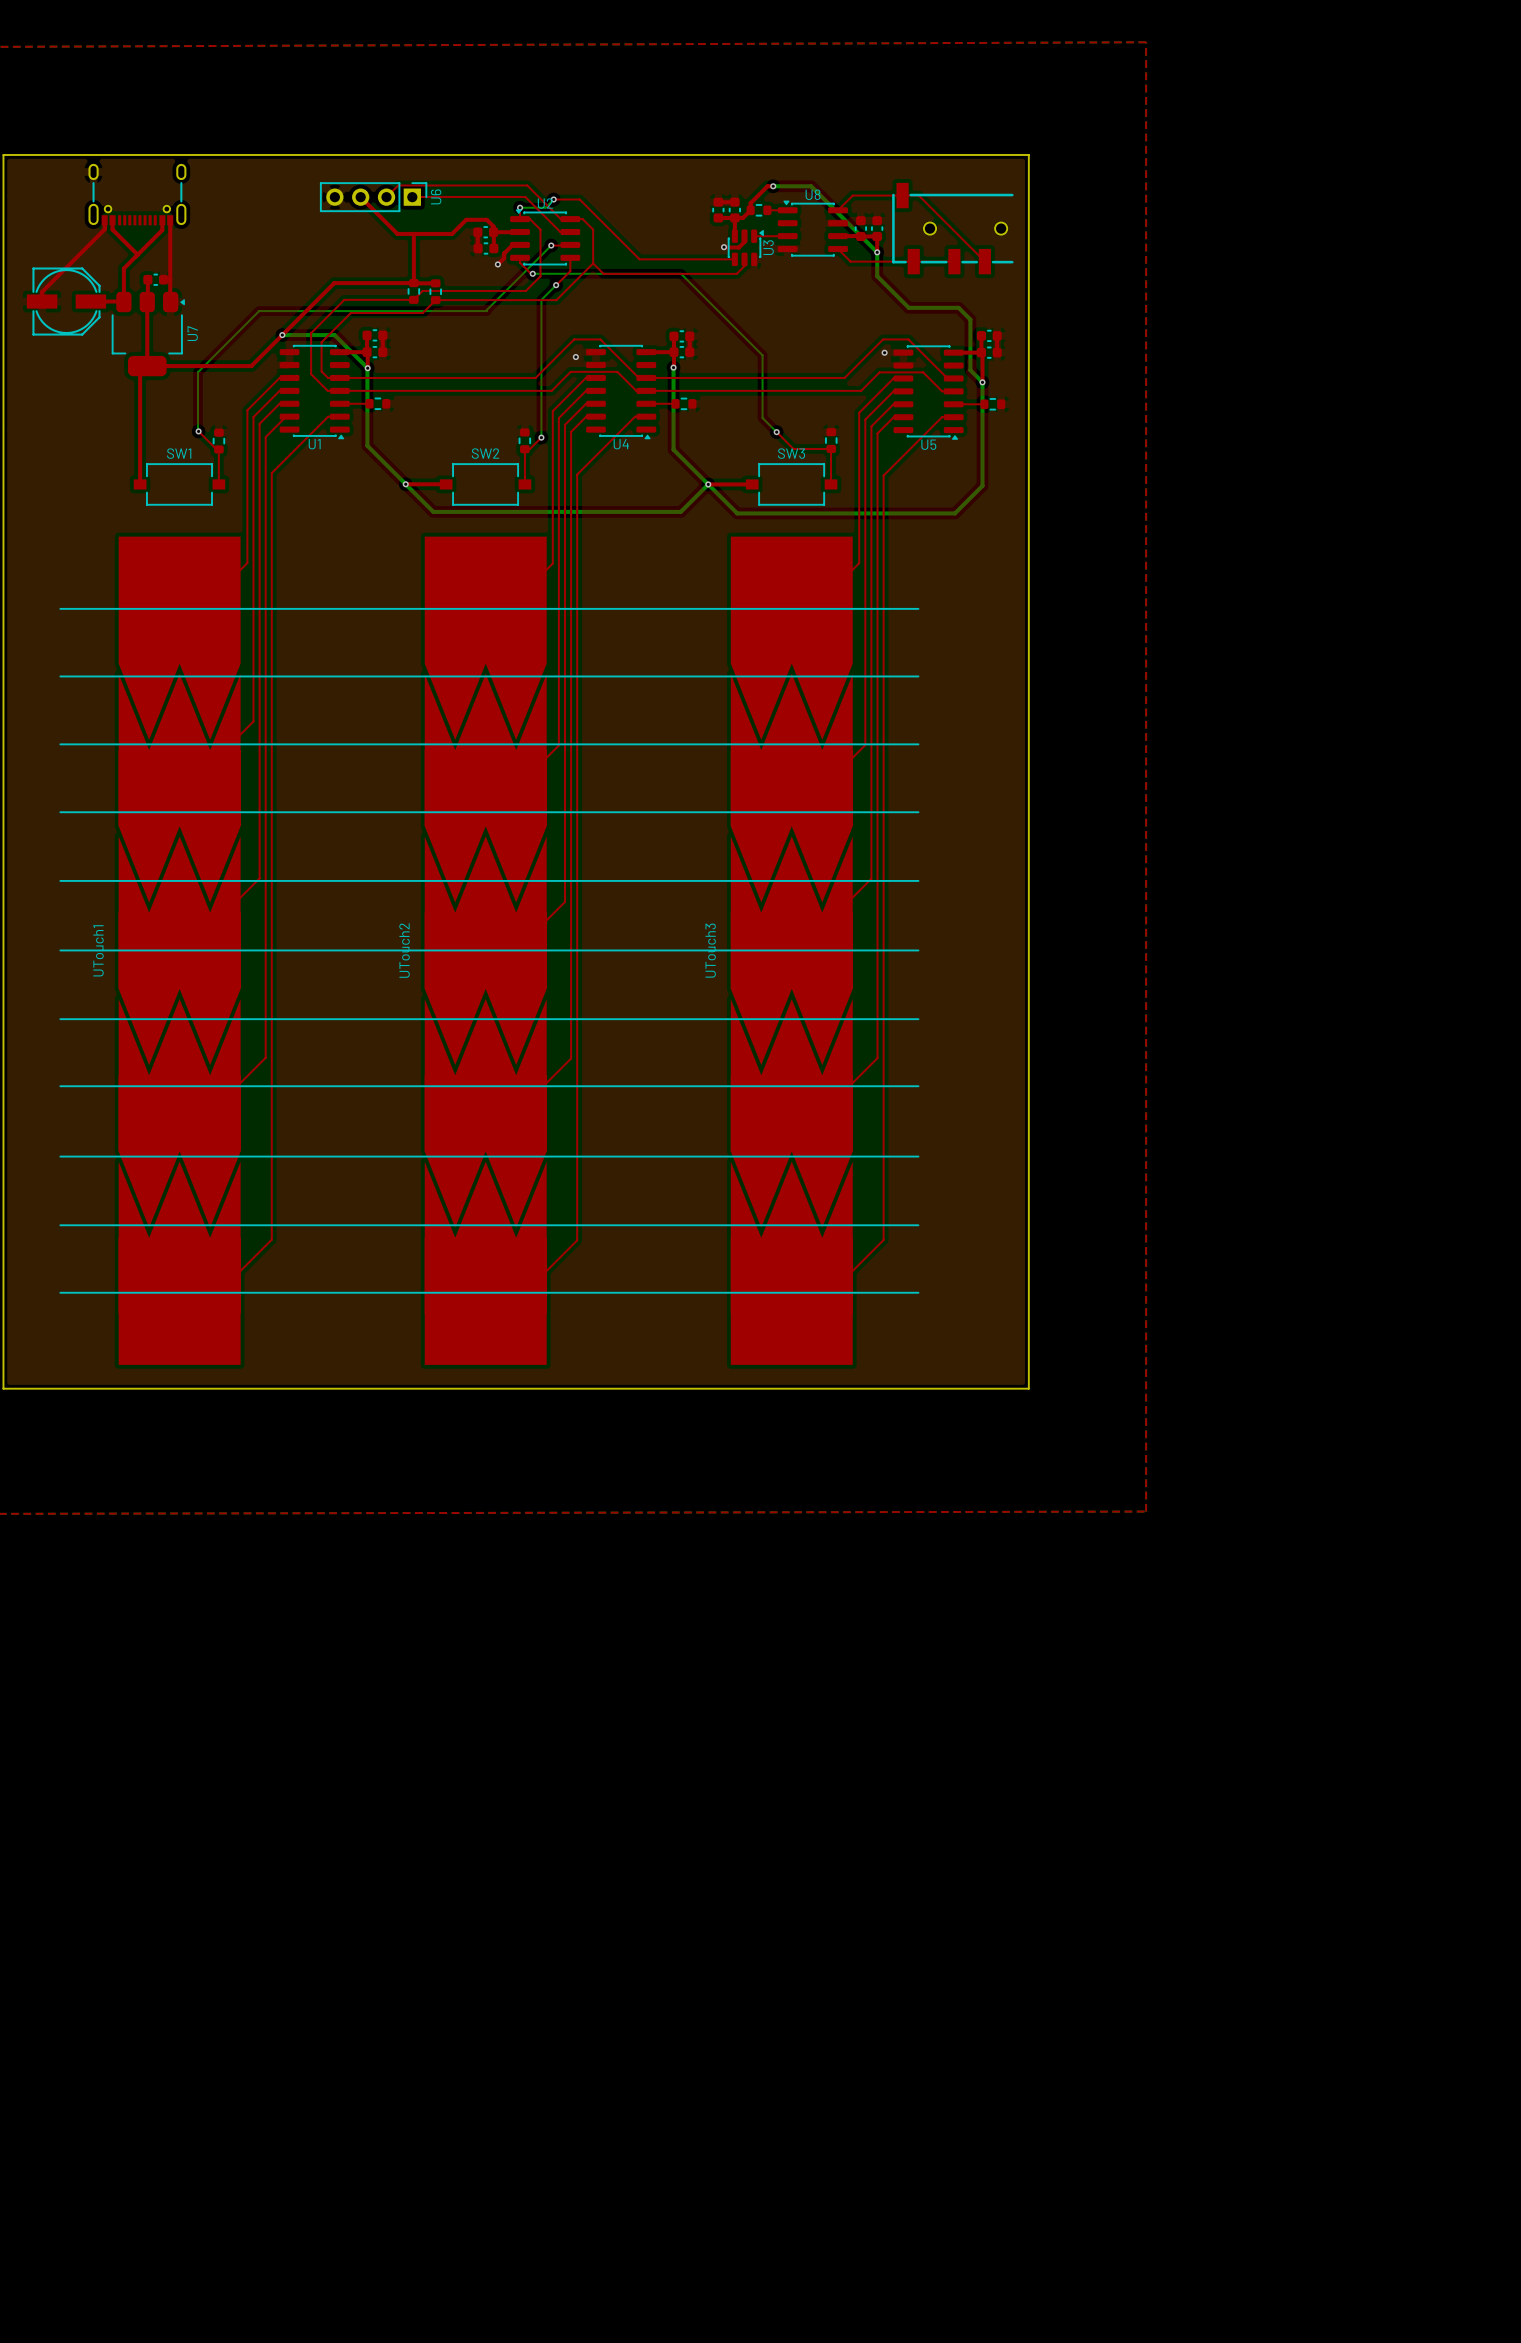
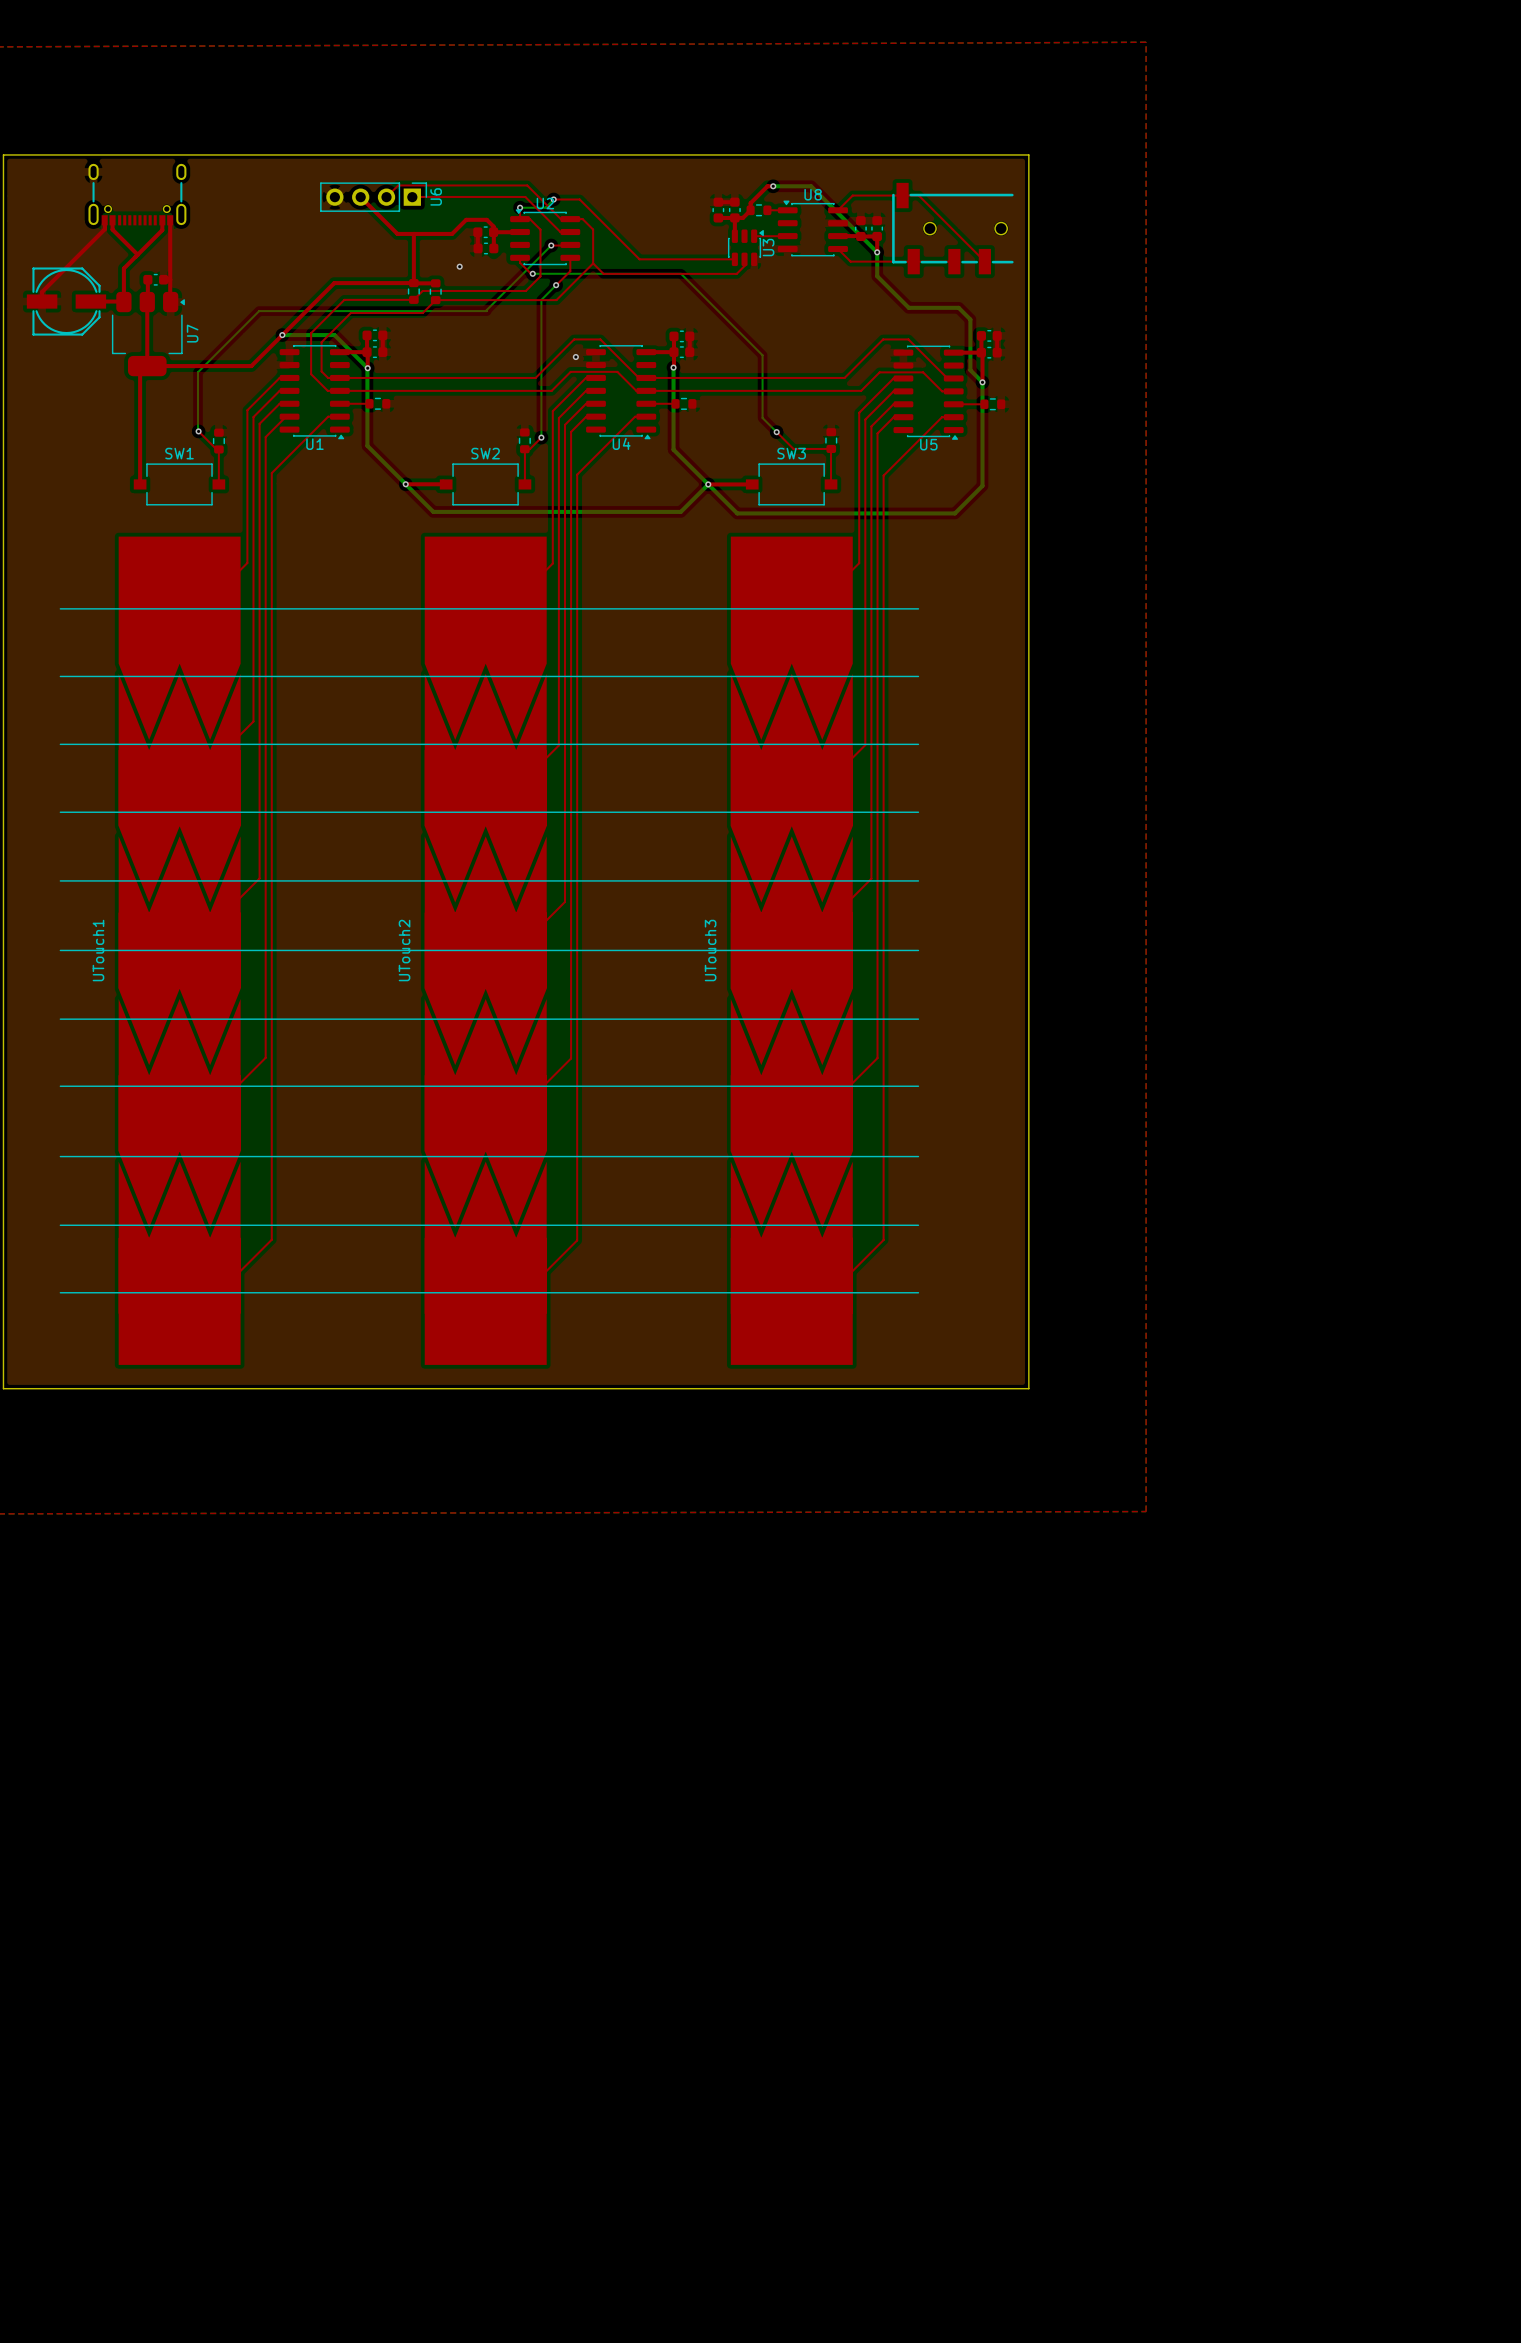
top track: (744, 236) (744, 241) (738, 247) (724, 247) -> none
top track: (520, 244) (512, 244) (504, 253) (504, 258) (497, 264) -> none
via: (724, 247) -> none
via position: (497, 264) -> (459, 266)
via: (884, 352) -> none

